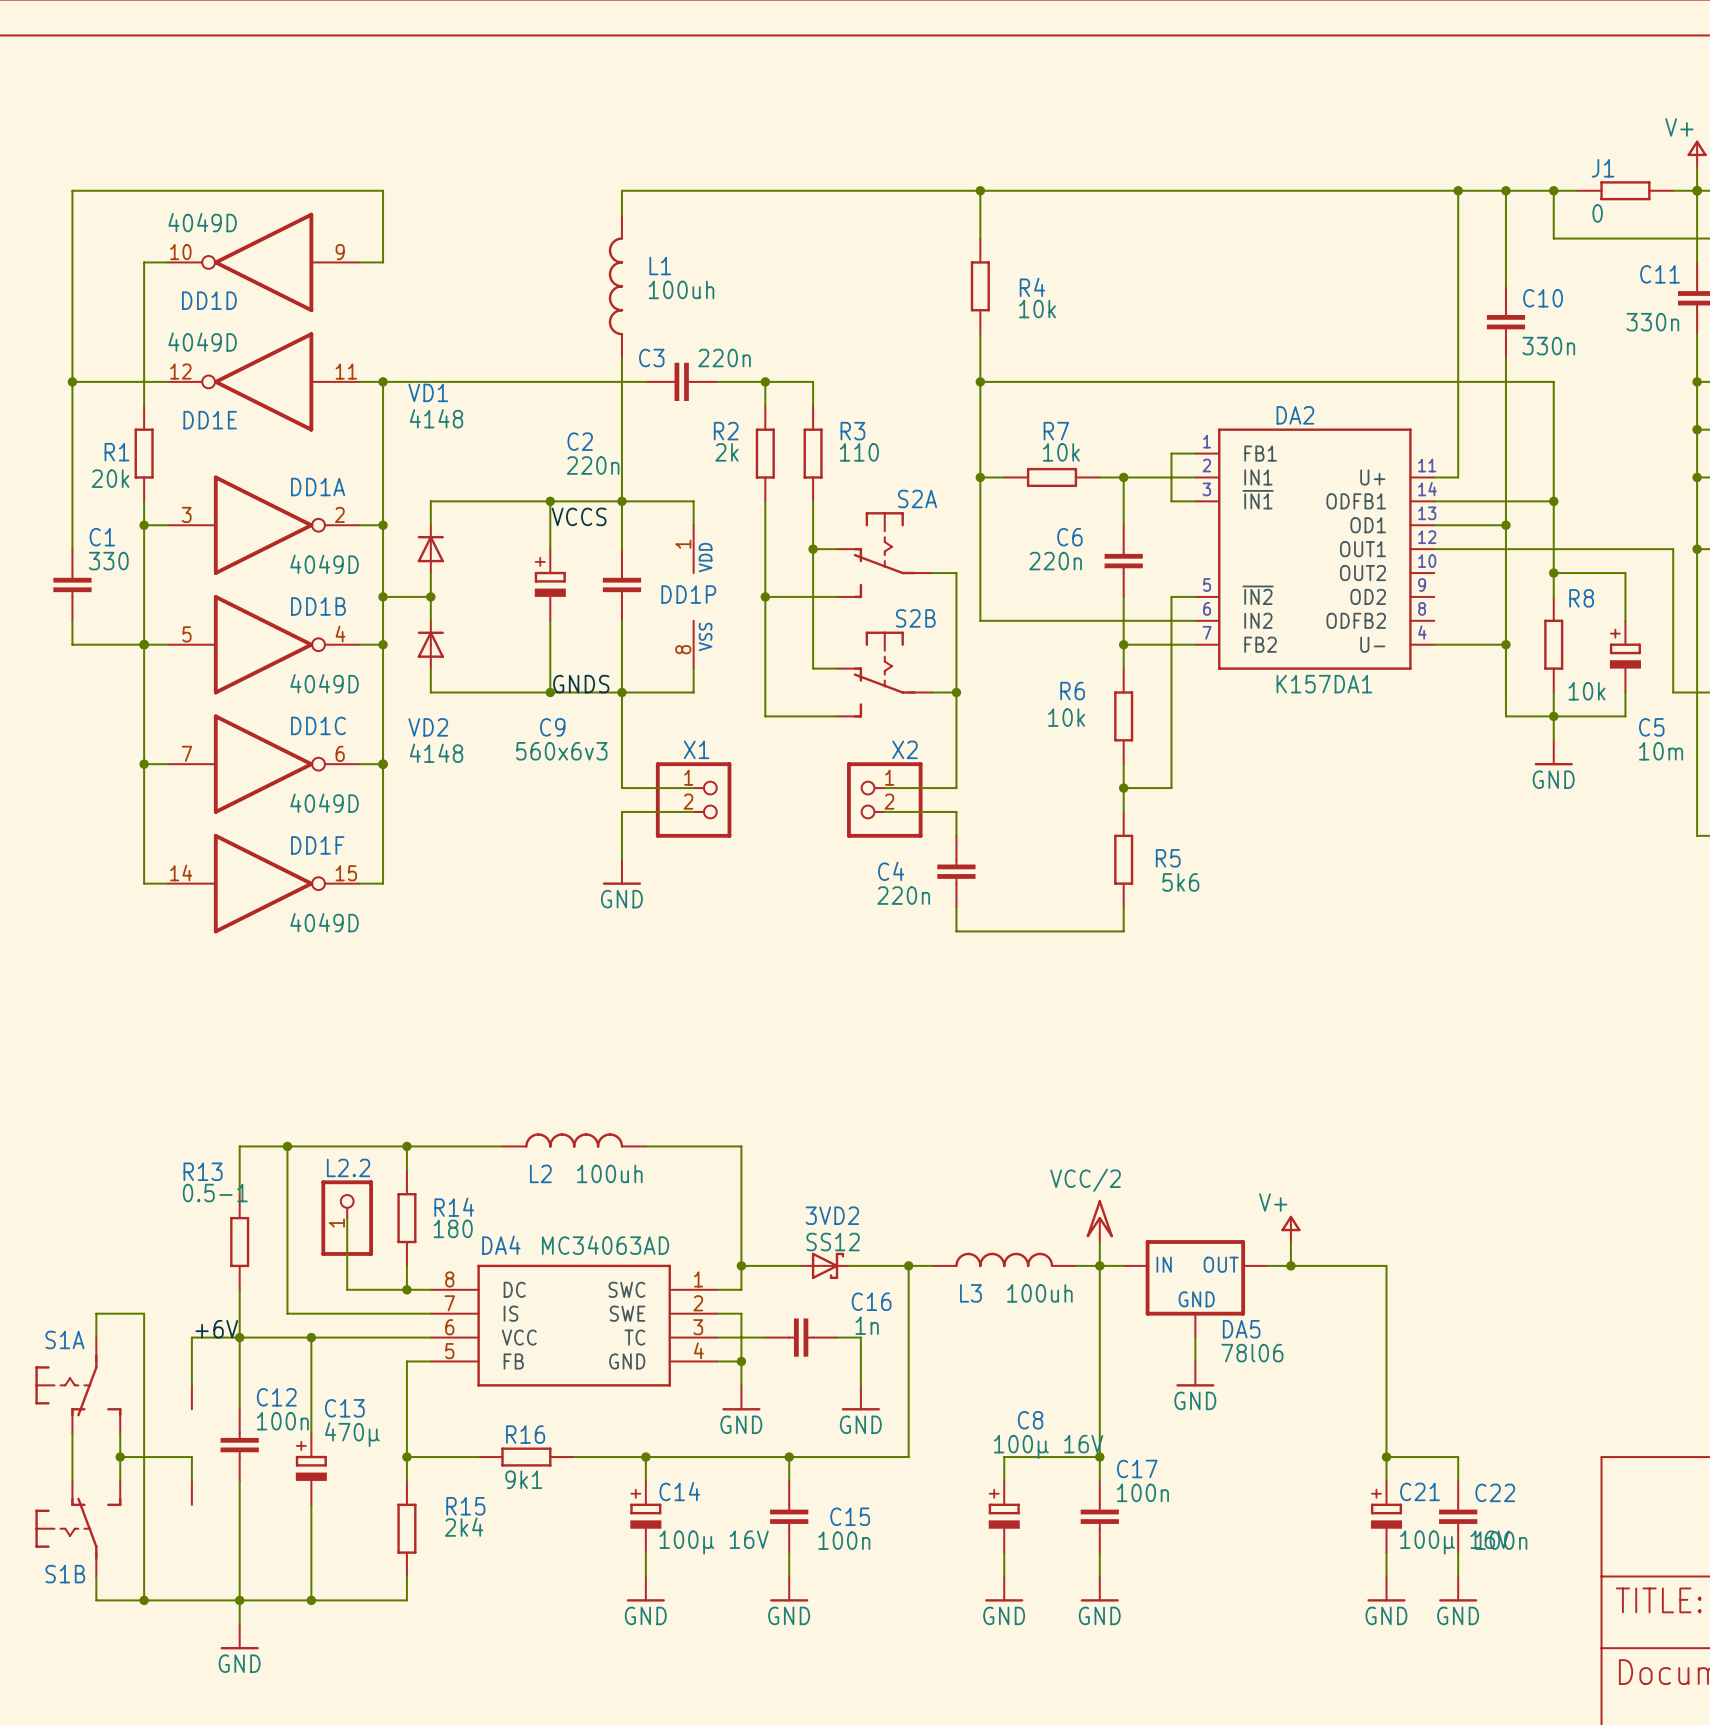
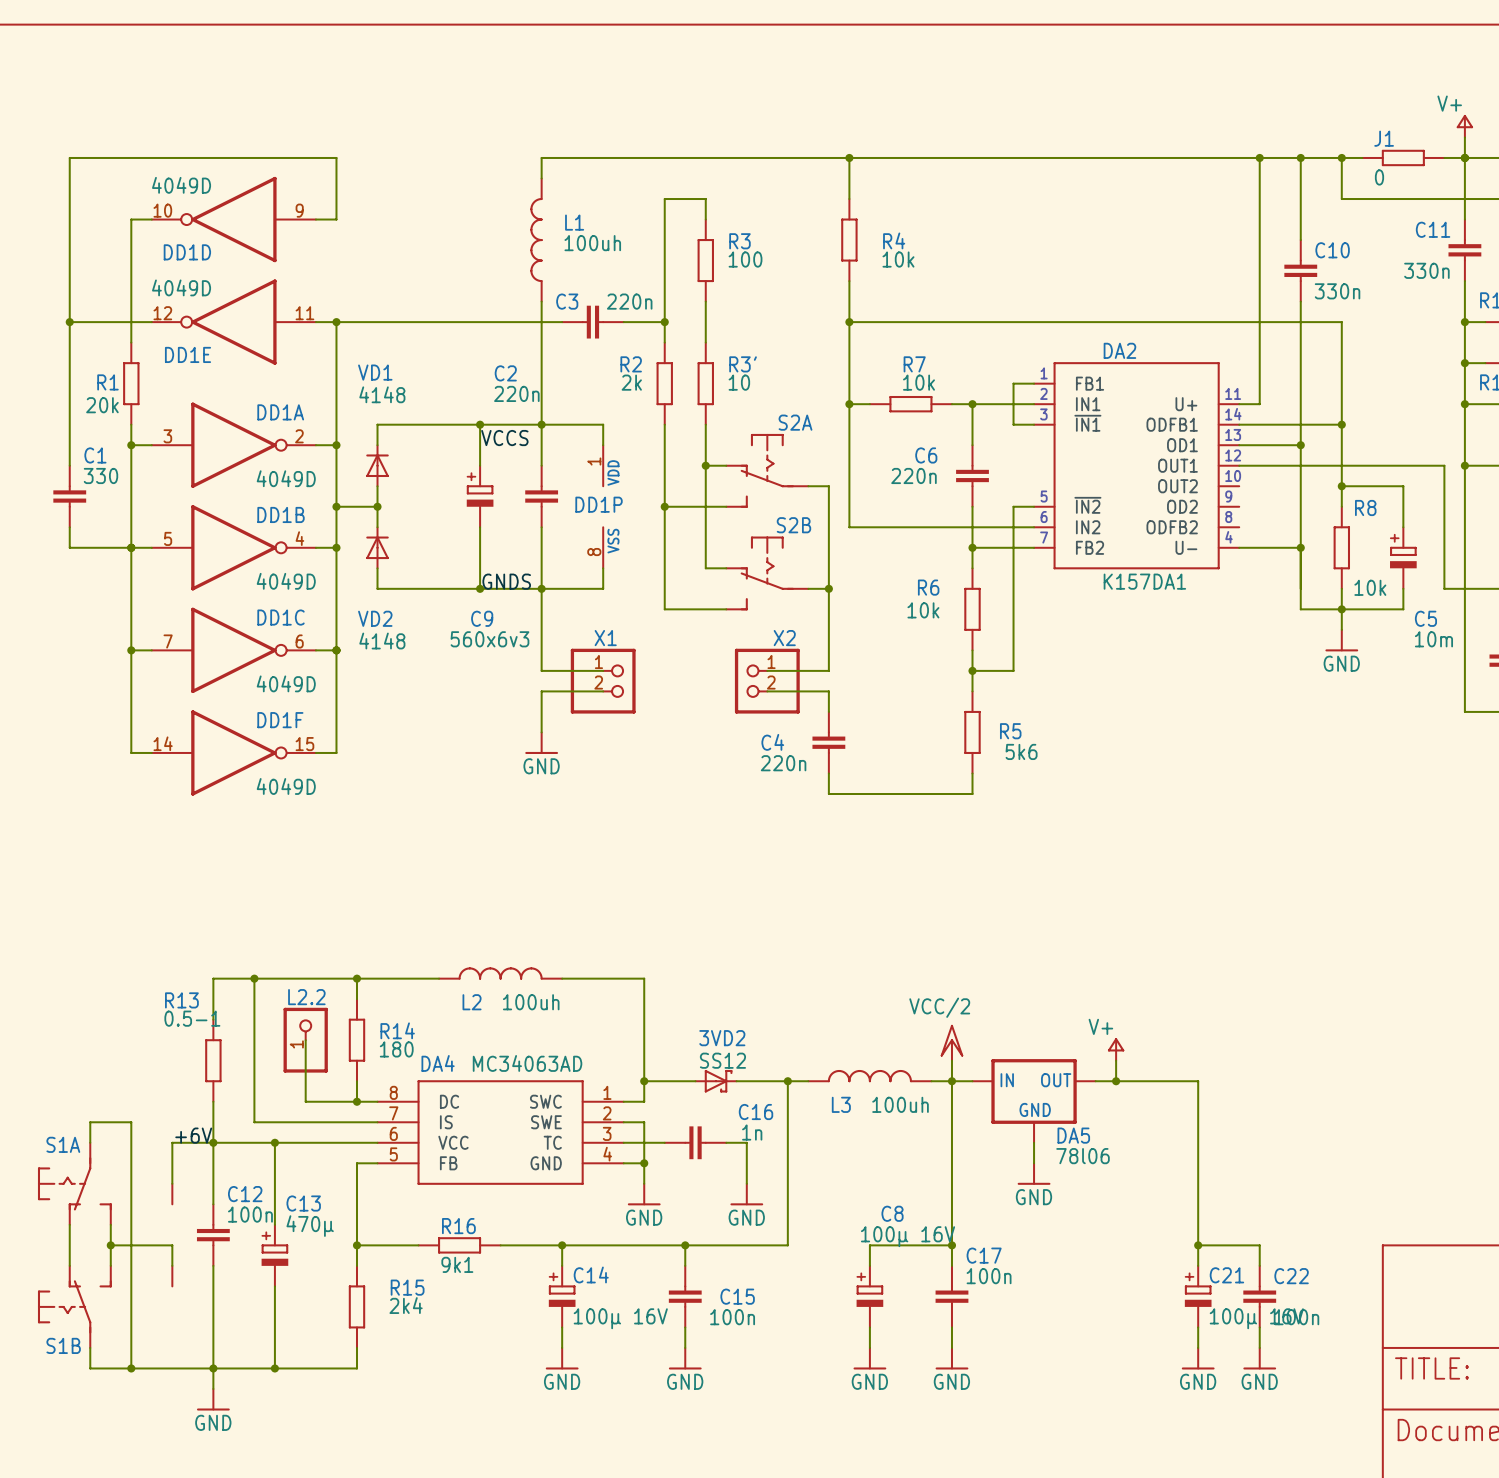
wire: none -> (705, 219) (705, 199) (664, 199) (664, 322)
R3: none -> 100 (705, 260)
wire: (765, 381) (813, 381) -> (705, 301) (705, 322)
VD1 name position: VD1 (428, 392) -> VD1 (375, 372)
VD1 value position: 4148 (436, 418) -> 4148 (382, 394)
R3 name: R3 (852, 431) -> R3' (743, 364)
R3 value: 110 (859, 452) -> 10 (739, 382)

